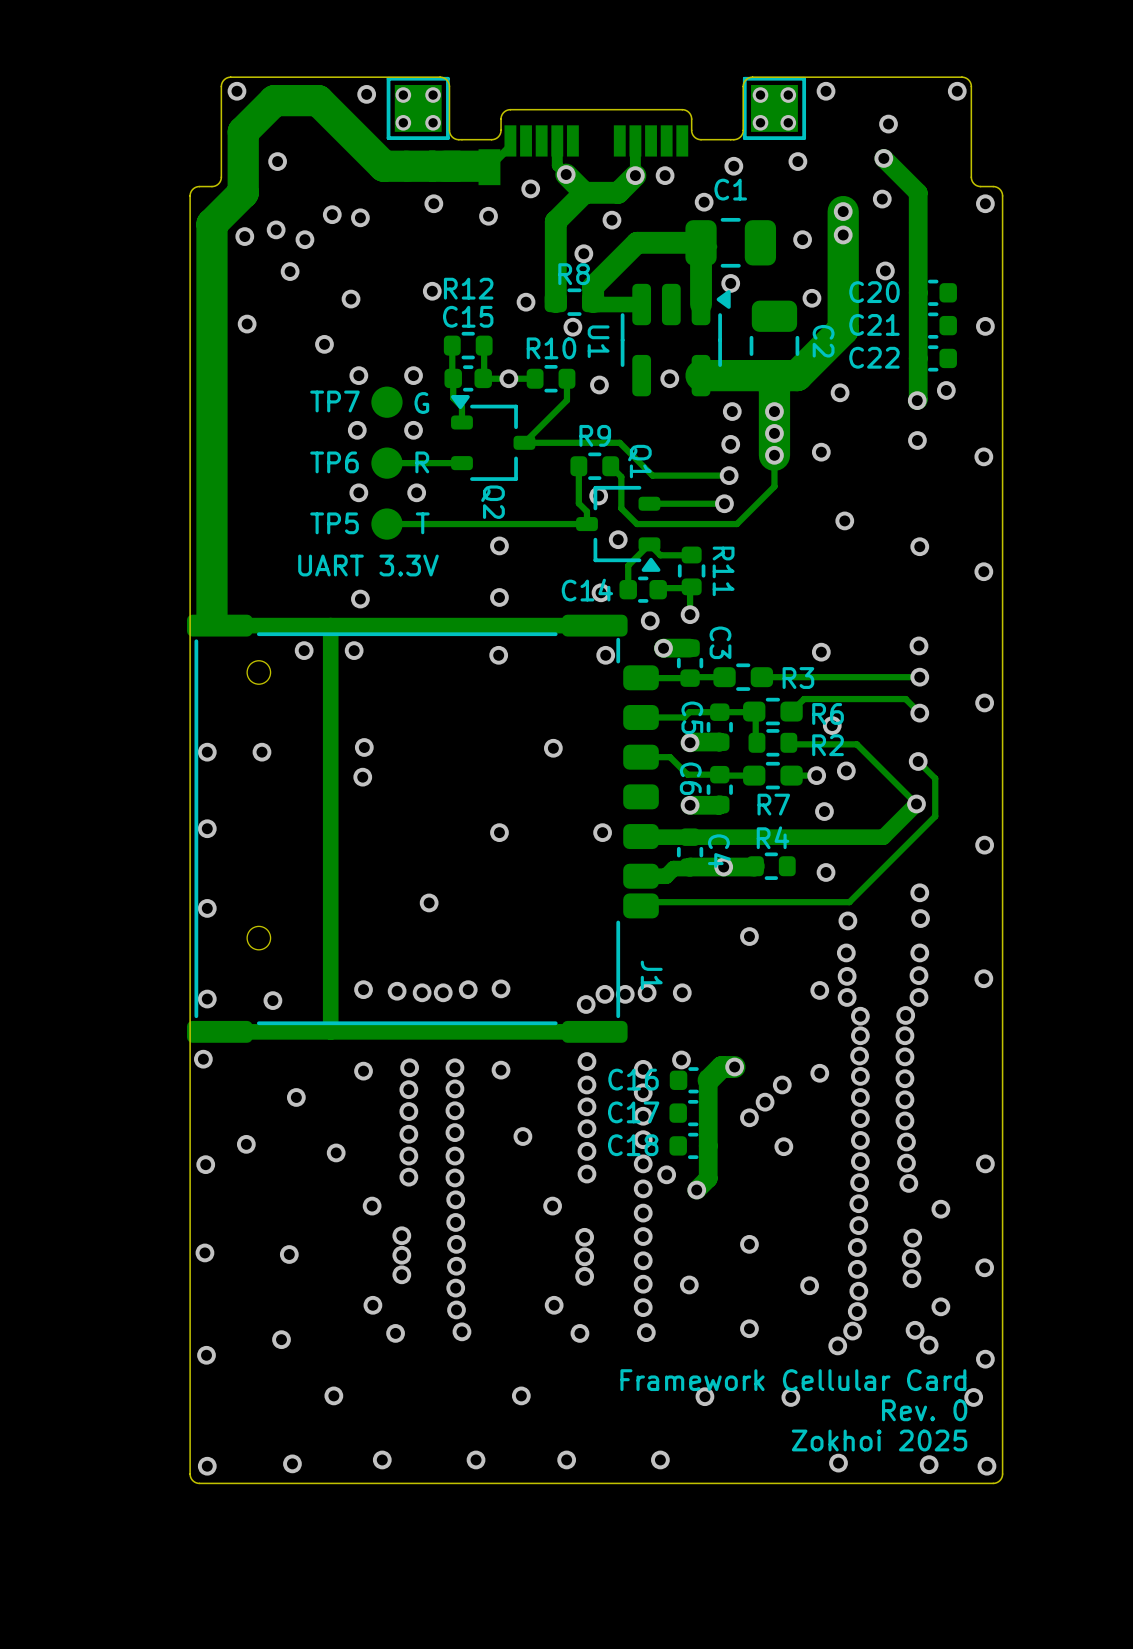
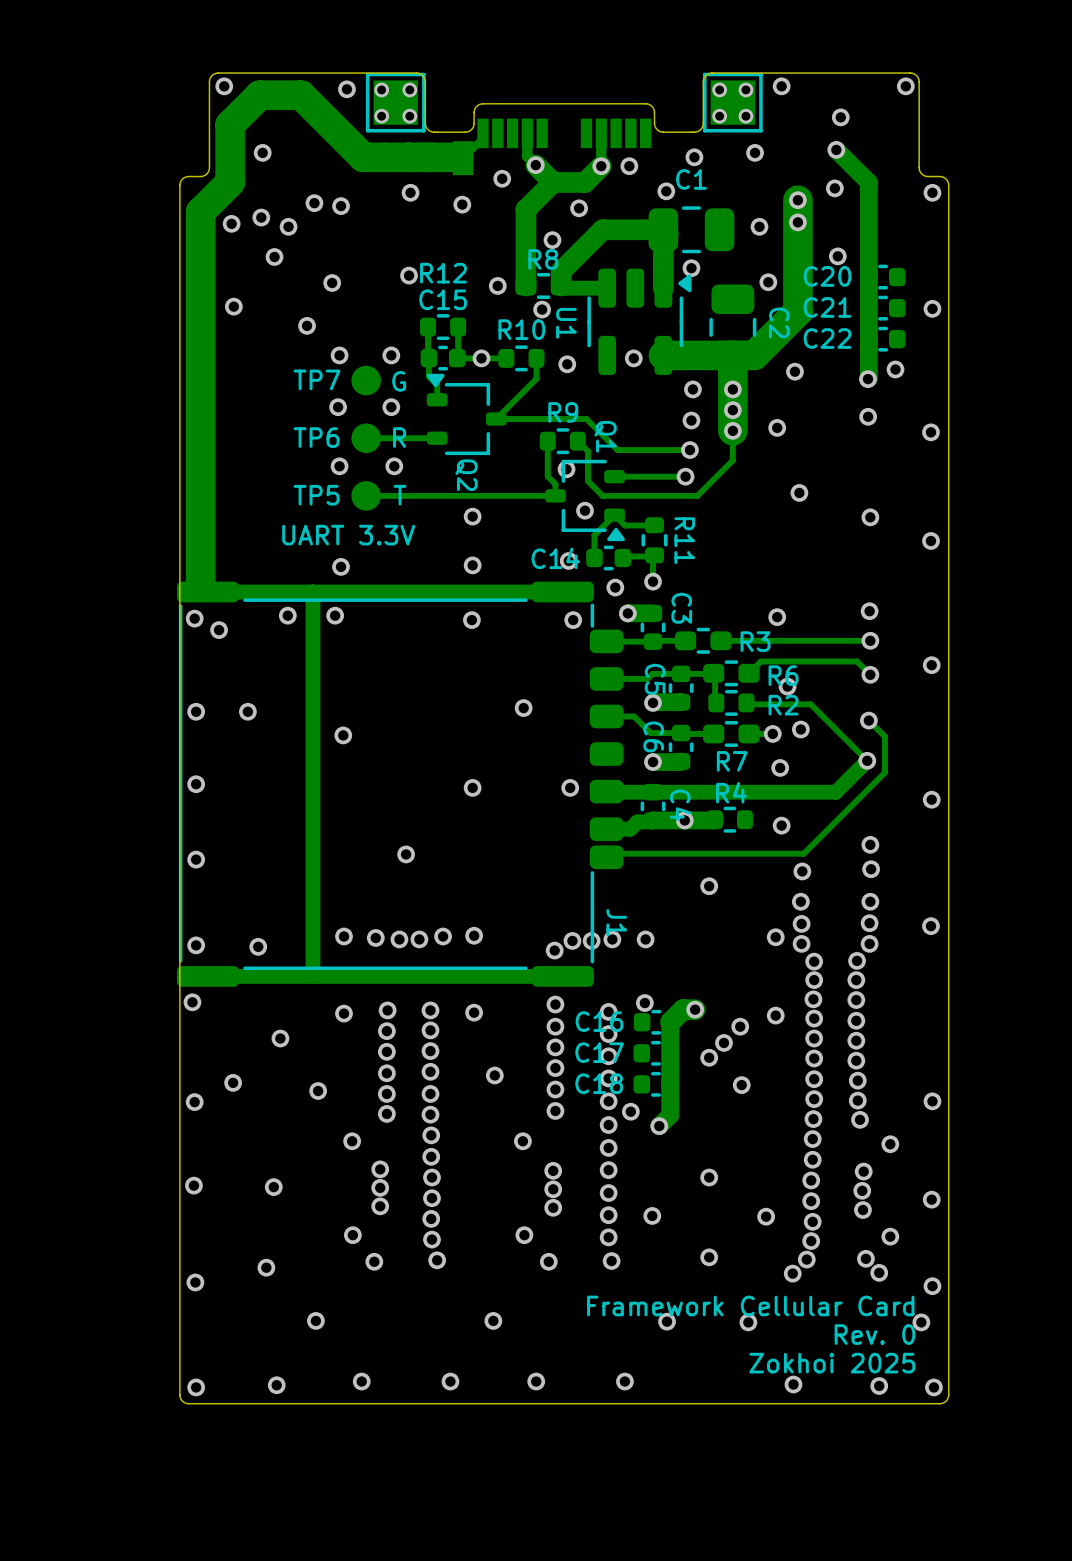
J1 footprint: [186, 614, 659, 1043] -> [176, 581, 624, 987]
via: none -> (194, 618)
via: none -> (219, 630)
via: (364, 747) -> none

